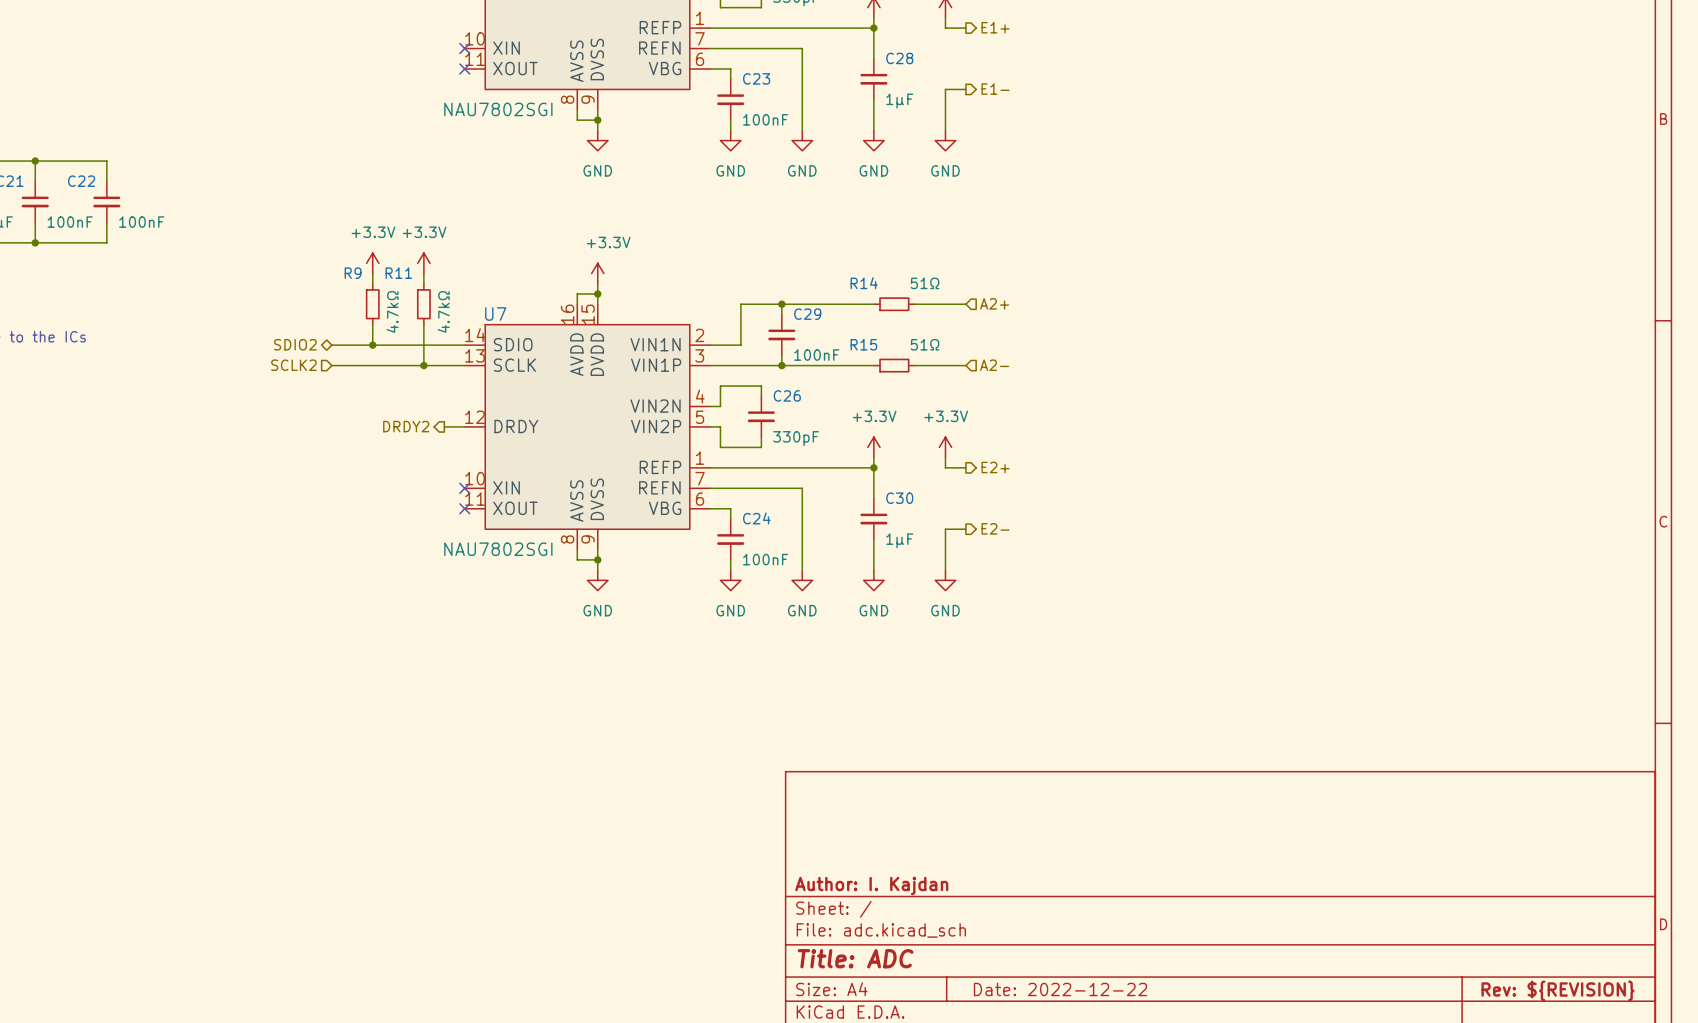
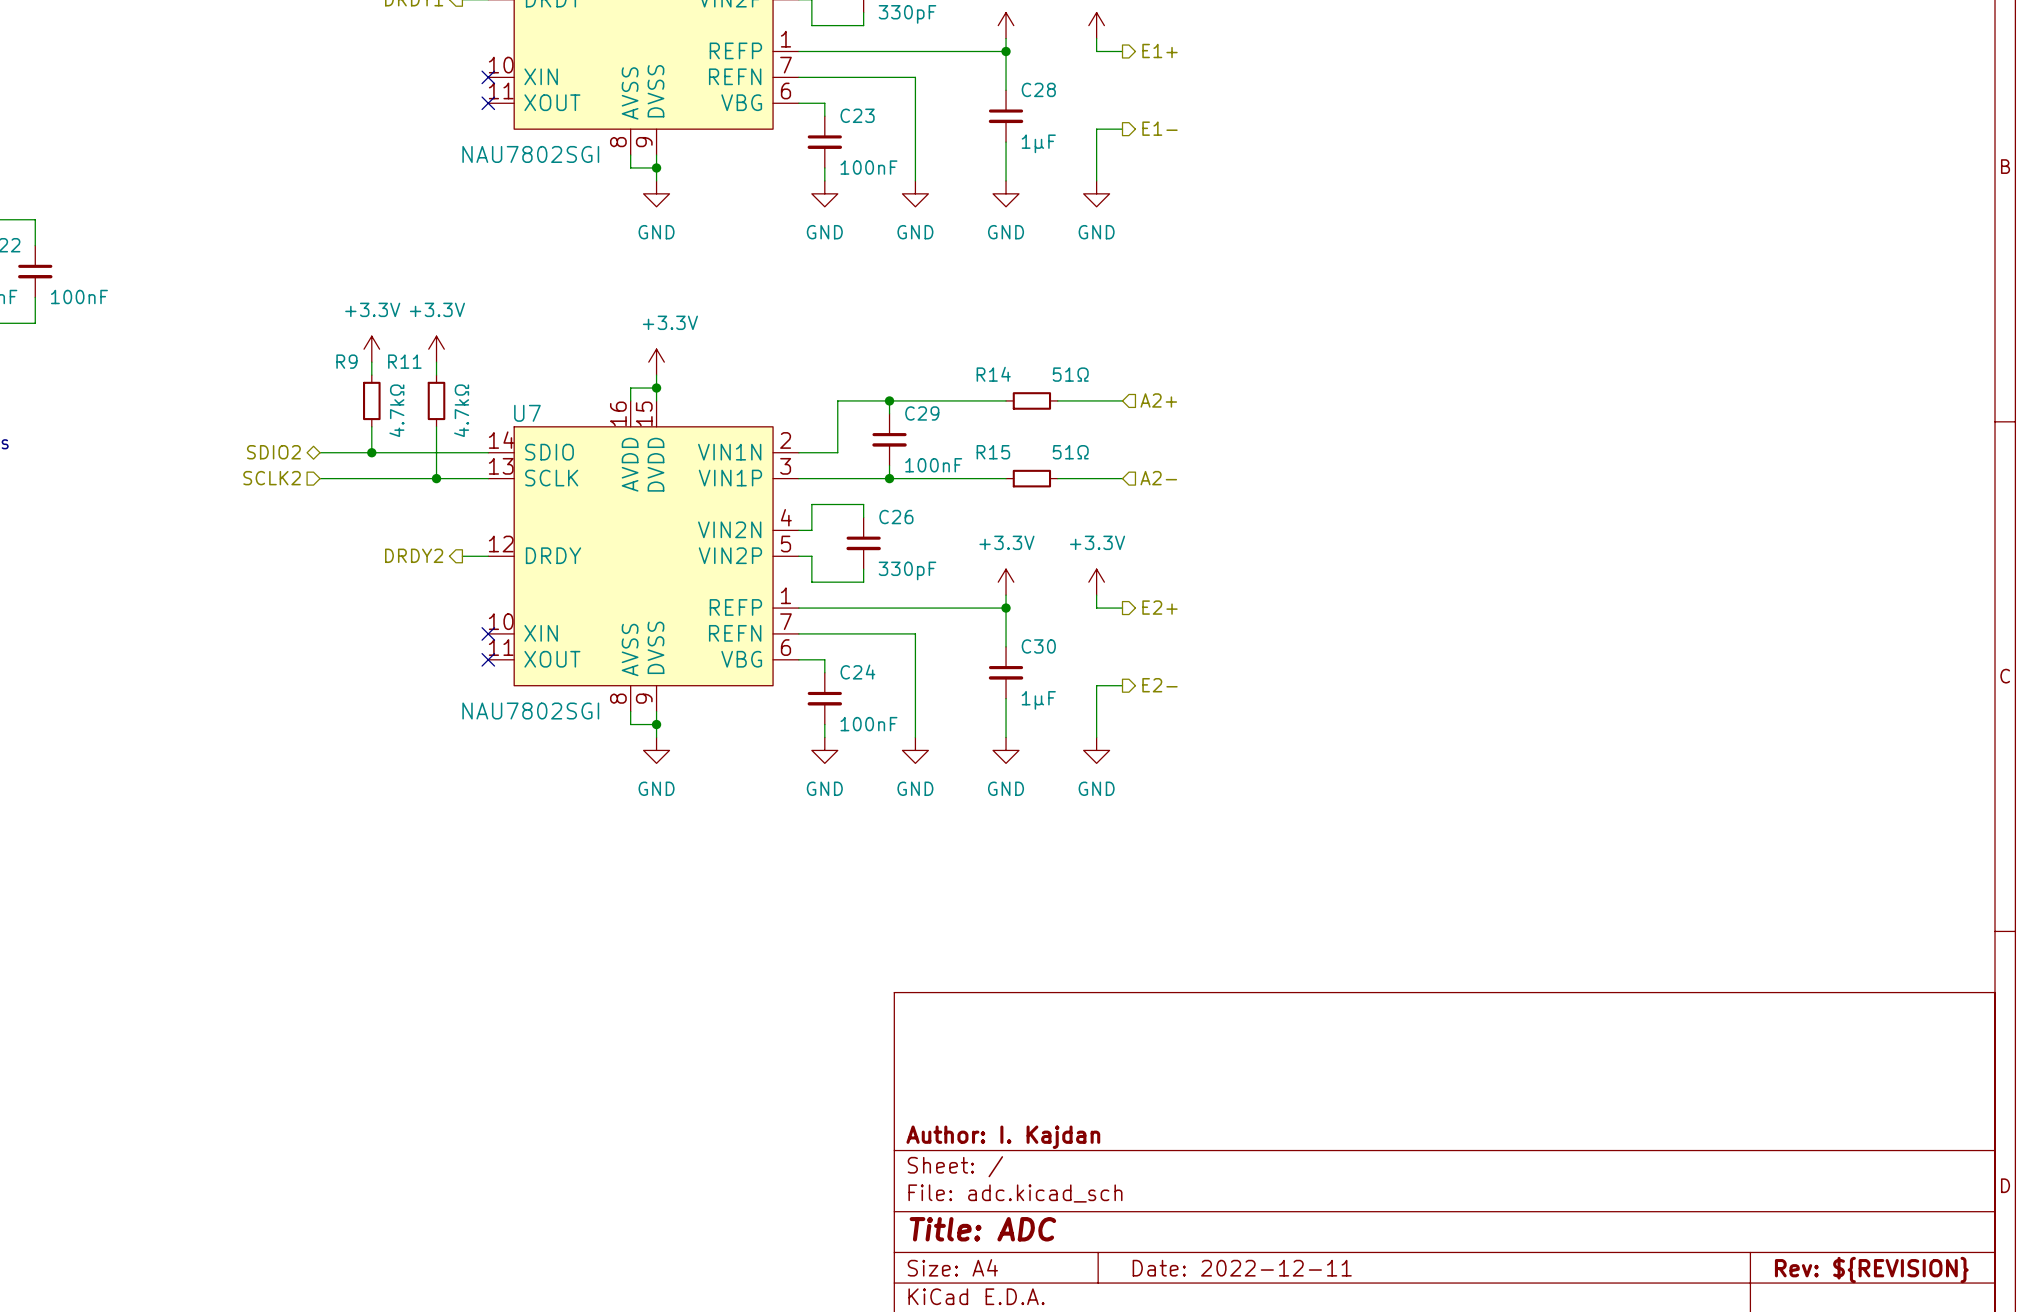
title block: Date: 2022-12-22 (1060, 989) -> Date: 2022-12-11 (1242, 1268)

